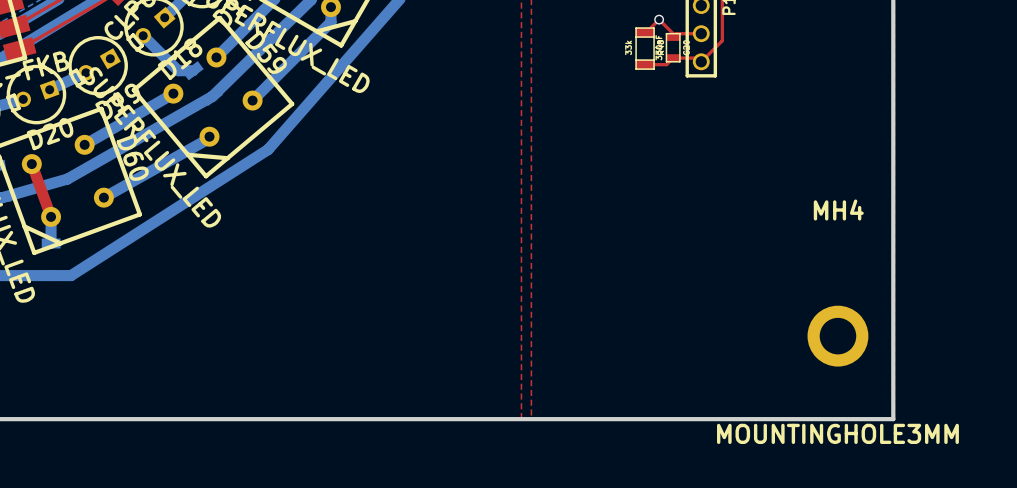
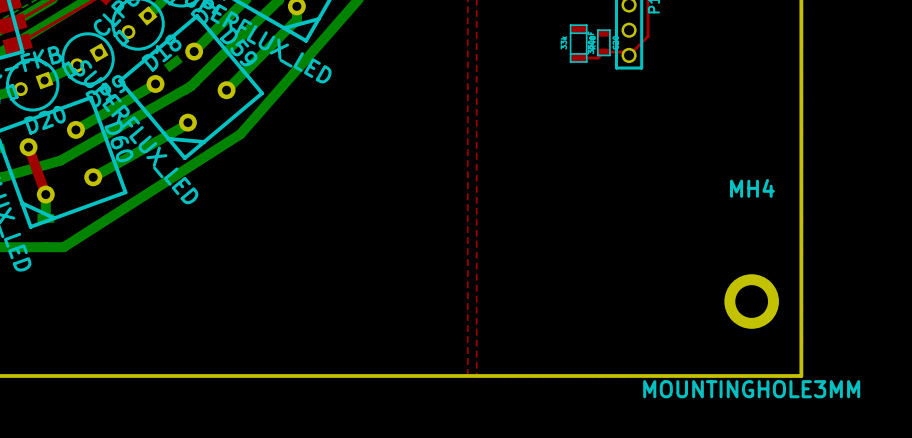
via: (659, 19) -> none
top track: (645, 32) (659, 19) (673, 33) (673, 37) (676, 33) (701, 33) -> none
bottom track: (143, 35) (178, 70) (193, 70) -> none

